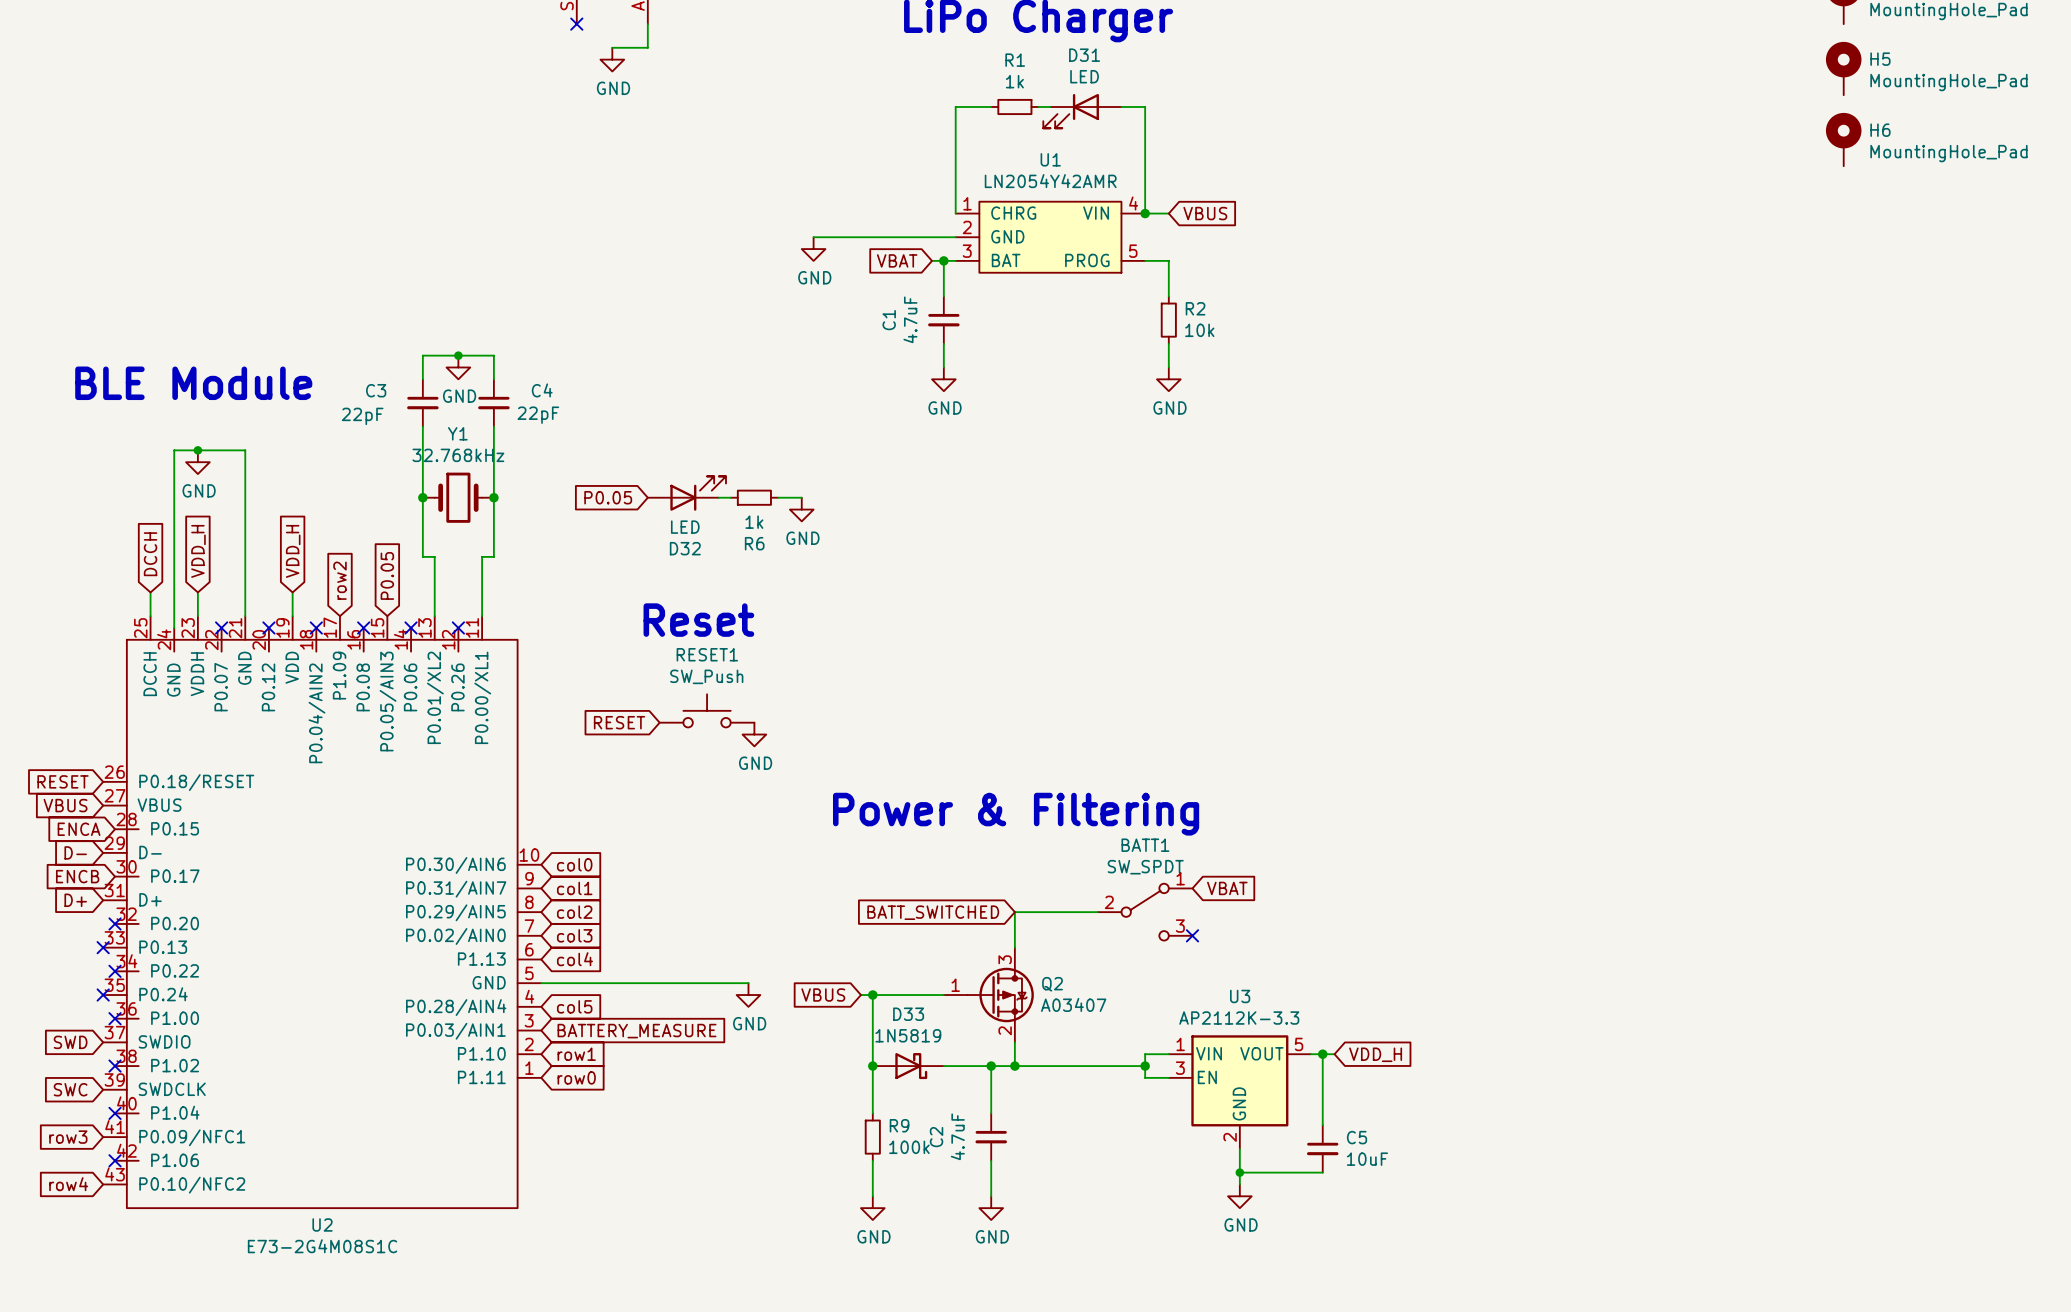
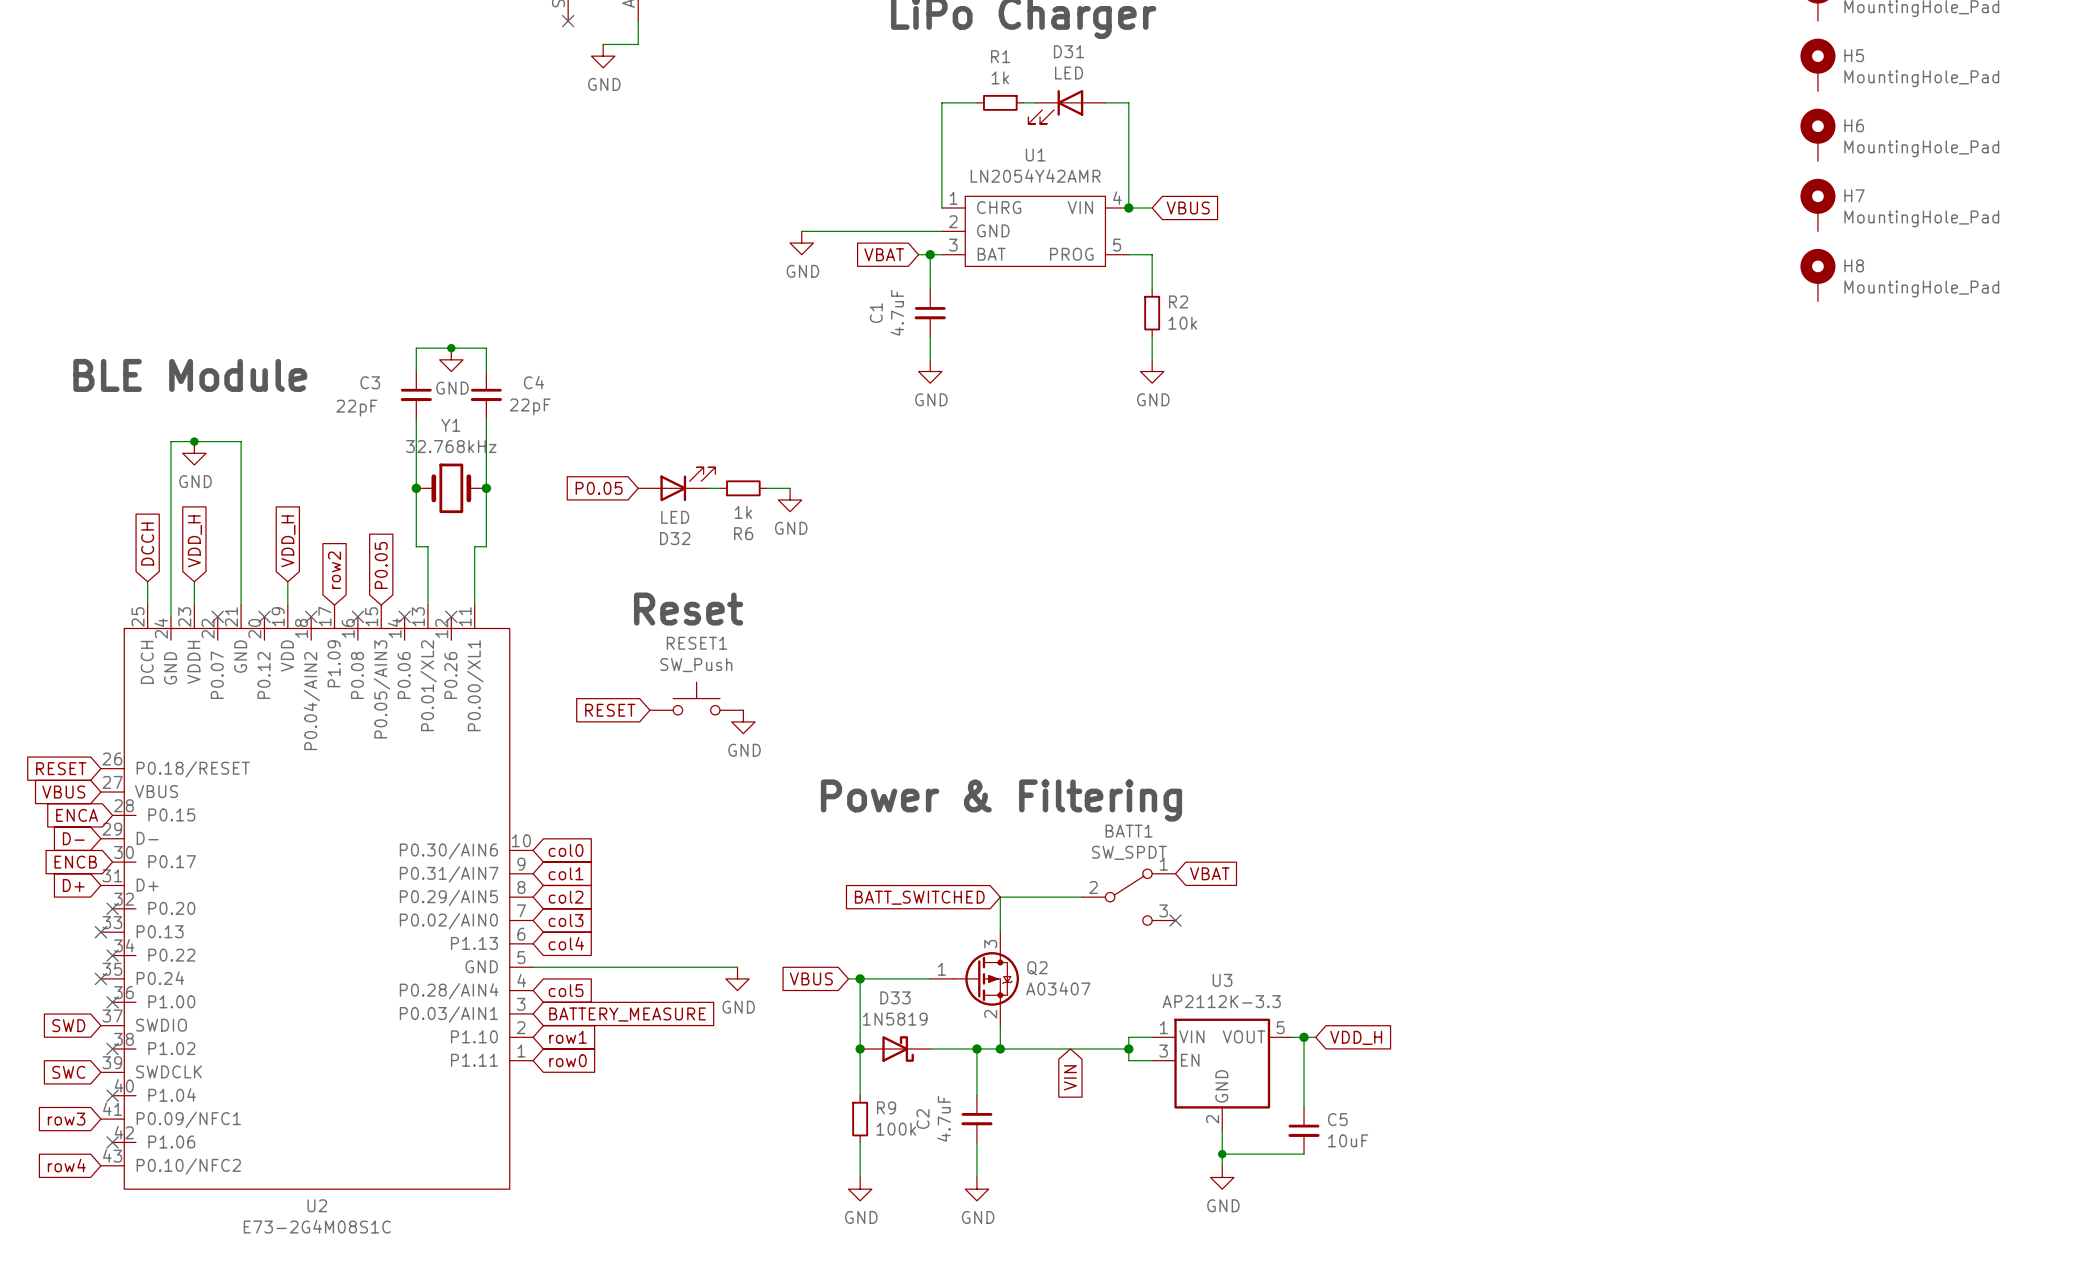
H7: none -> MountingHole_Pad (1817, 205)
H8: none -> MountingHole_Pad (1817, 275)
global label: none -> VIN (1070, 1077)

